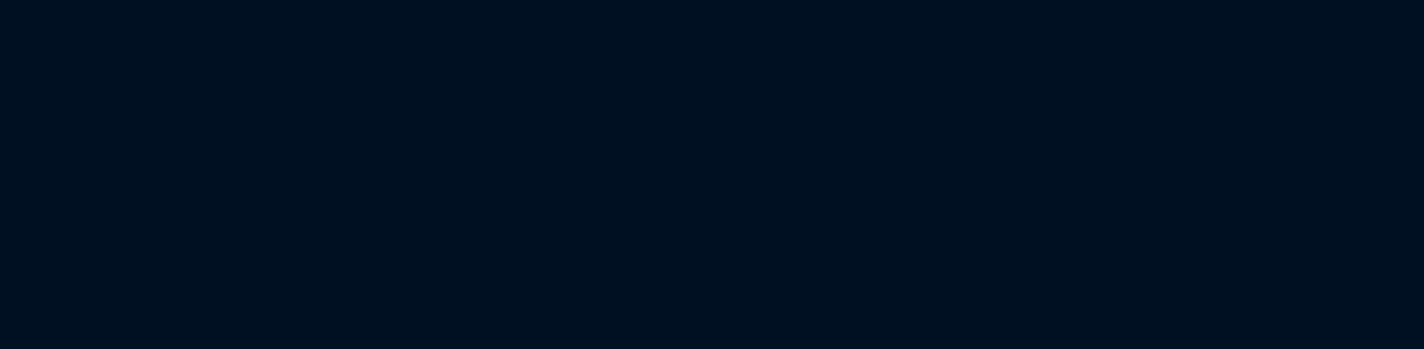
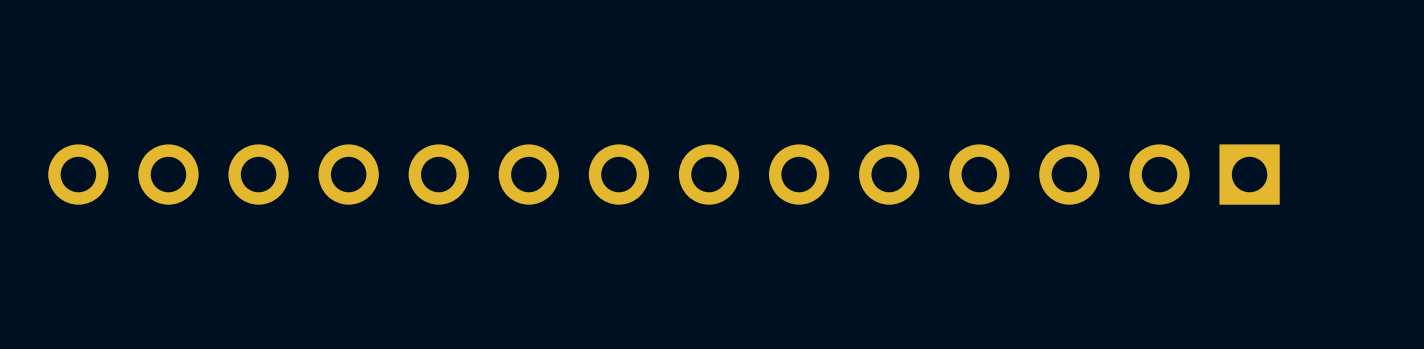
part: none -> (663, 174)

